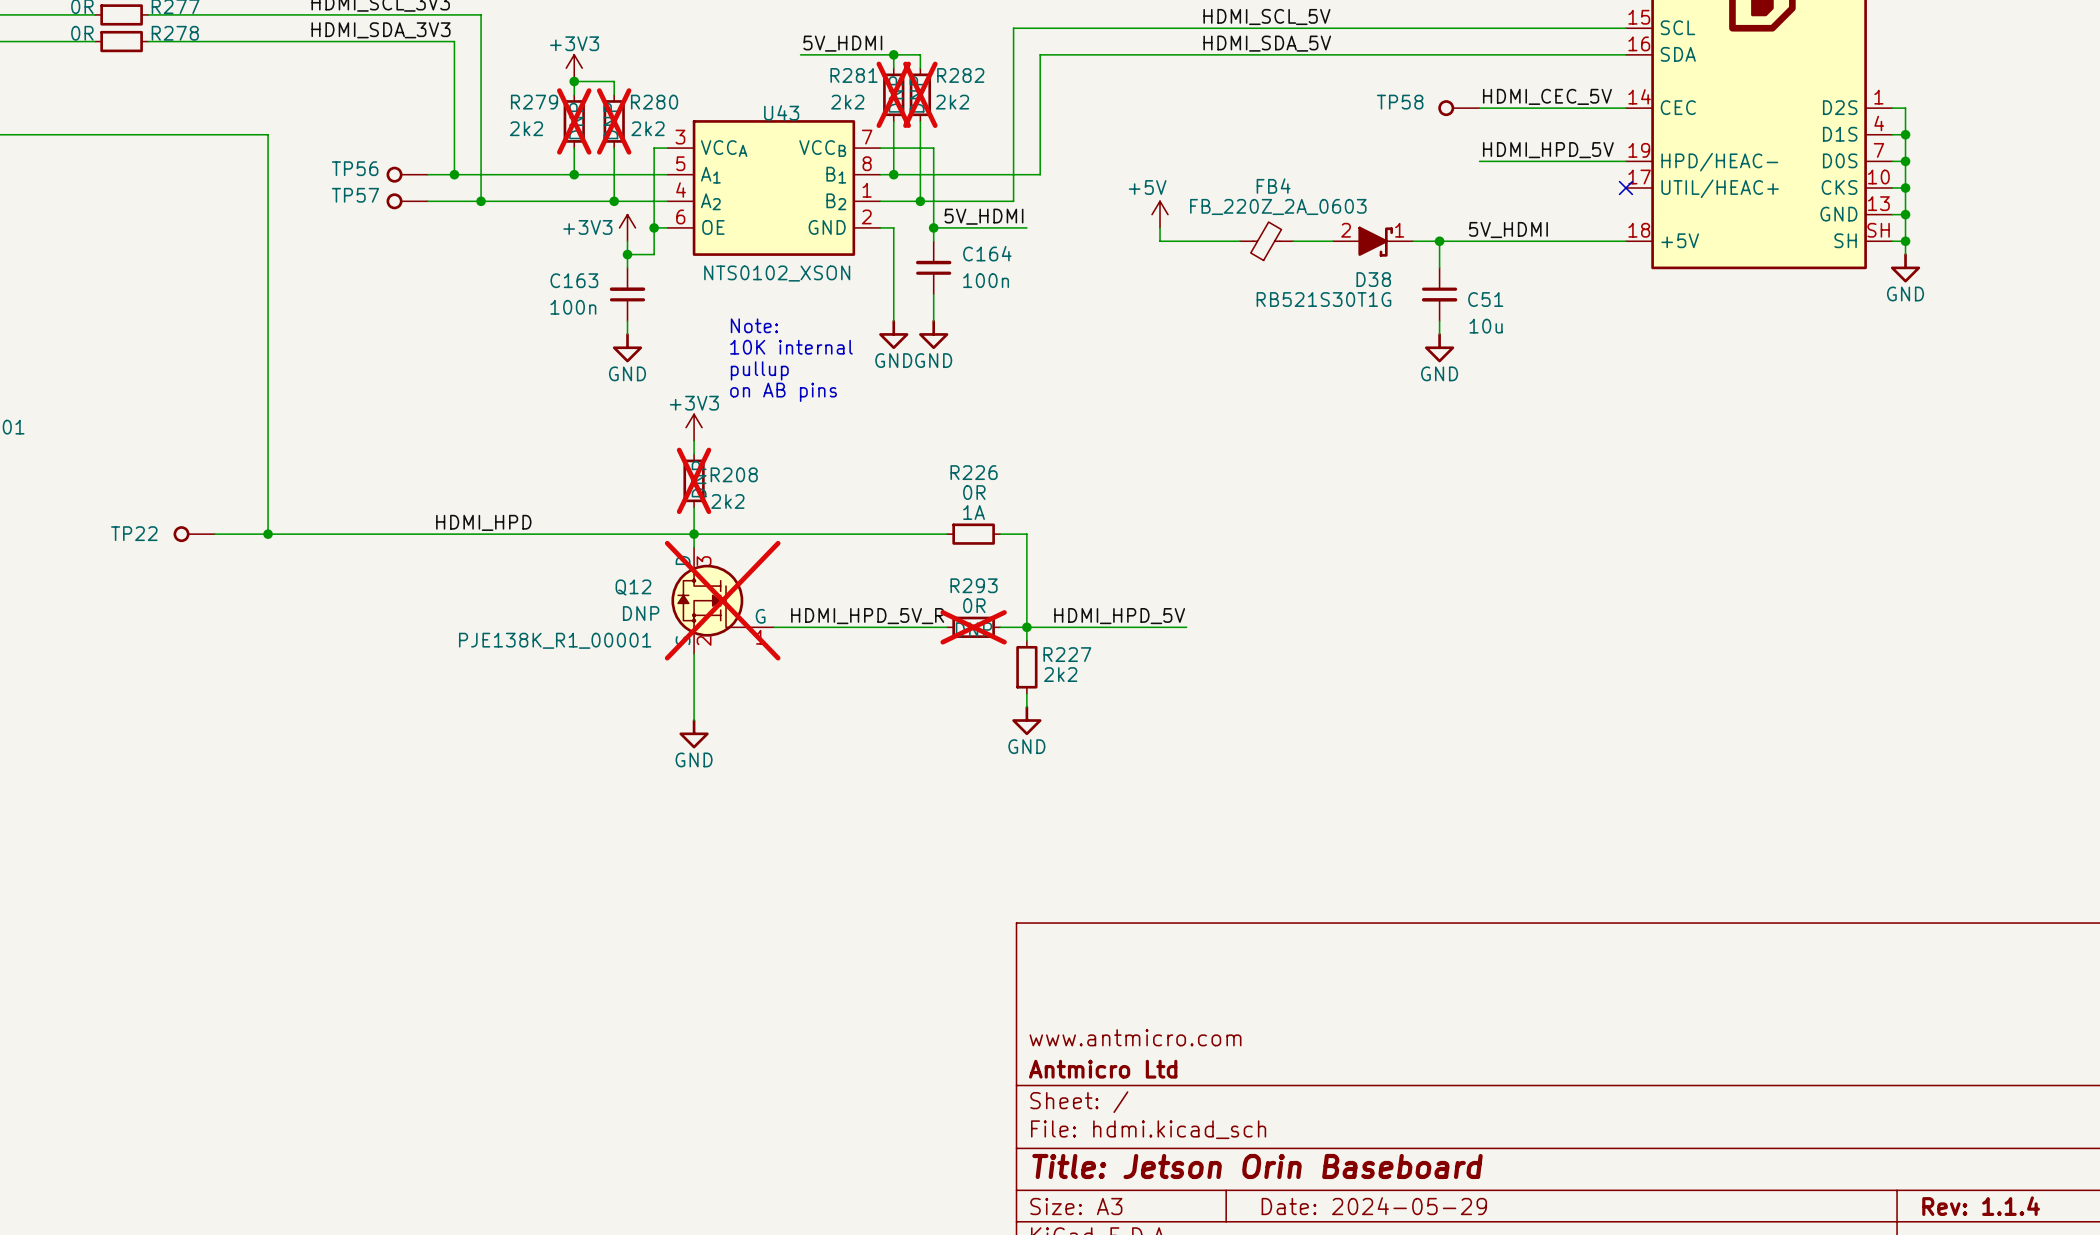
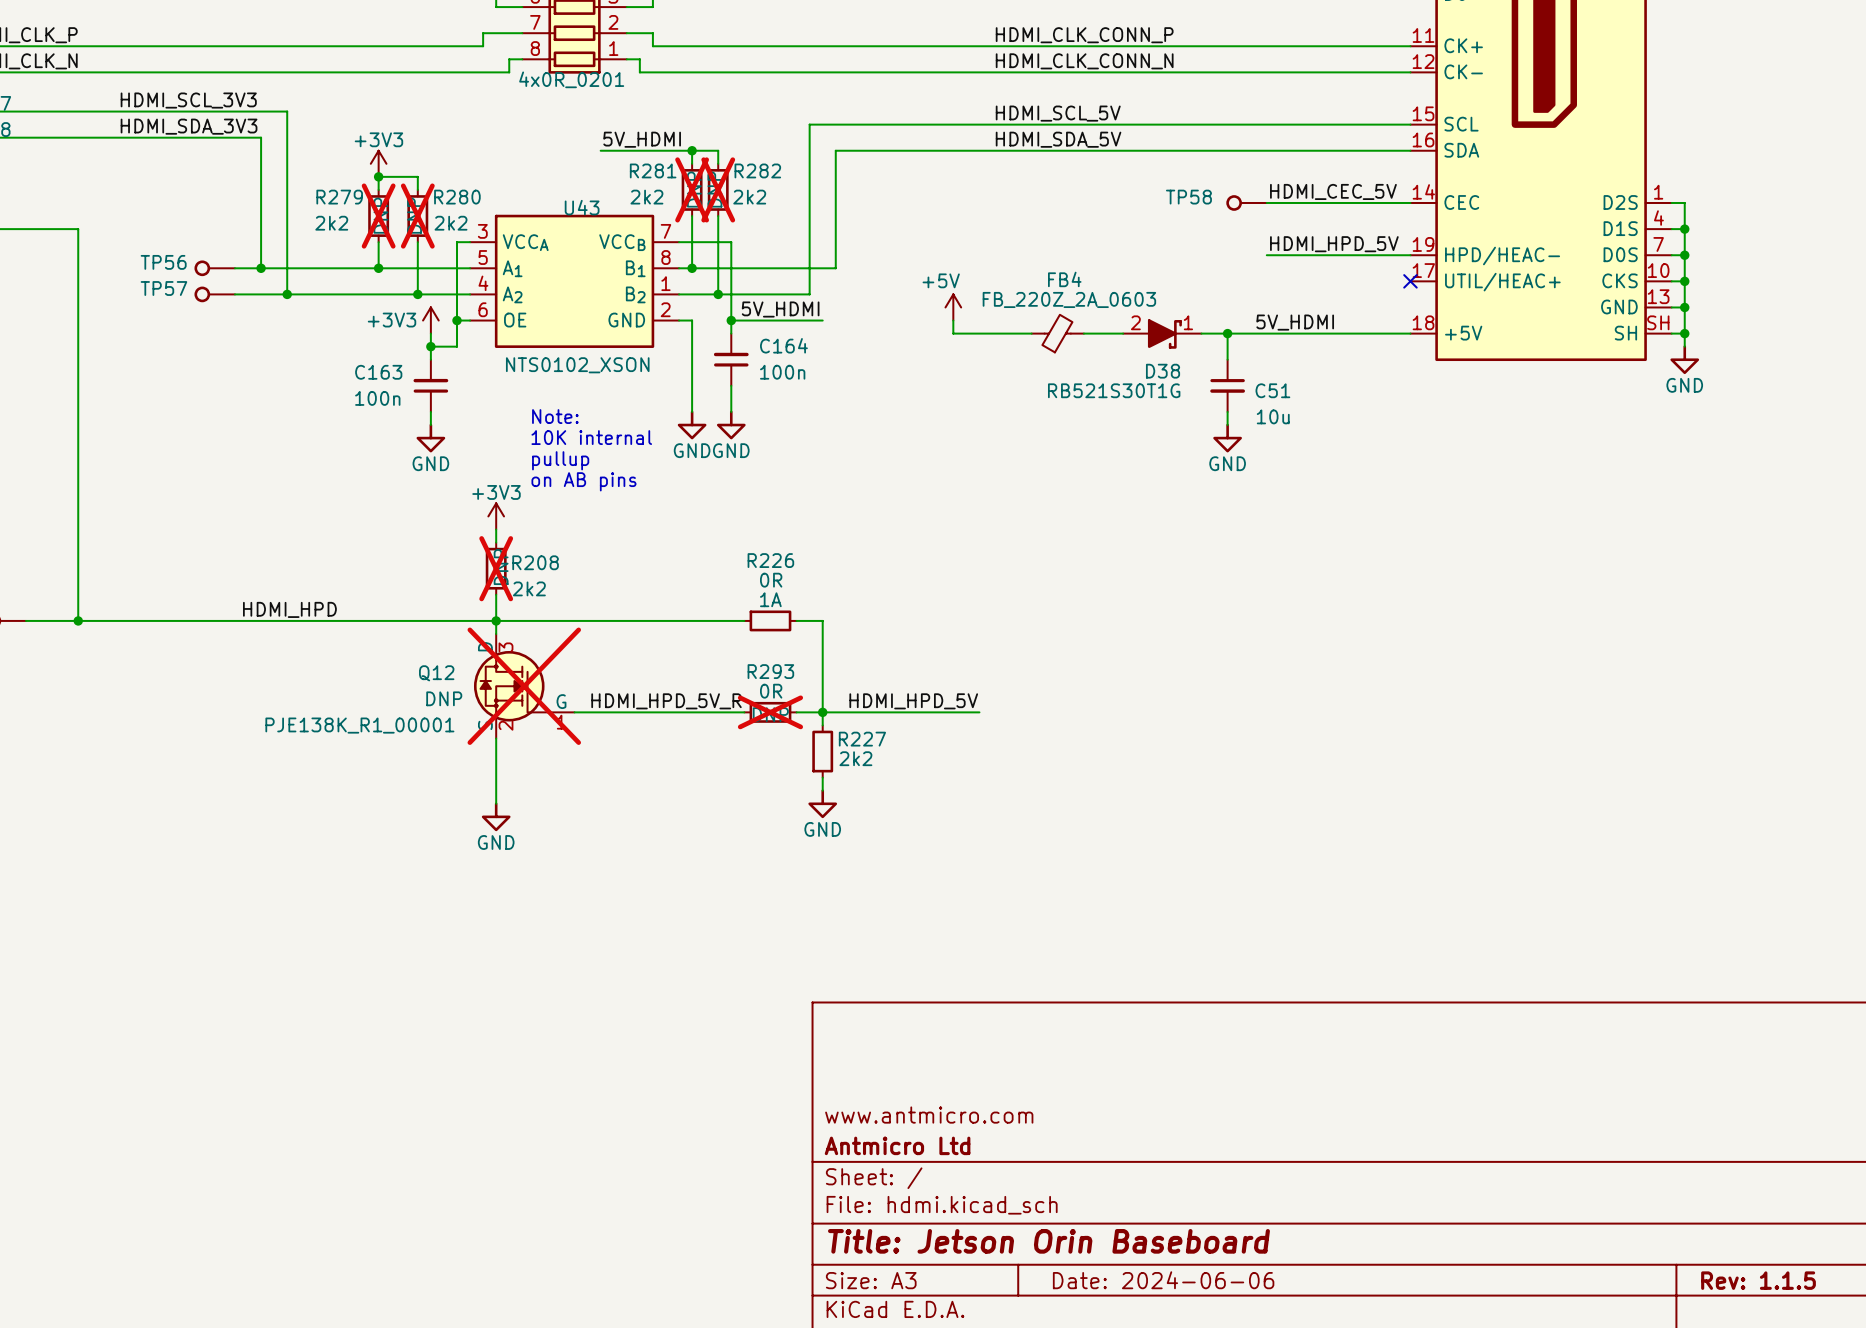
title block: Date: 2024-05-29 (1374, 1206) -> Date: 2024-06-06 (1163, 1280)
title block: Rev: 1.1.4 (1981, 1206) -> Rev: 1.1.5 (1758, 1280)

